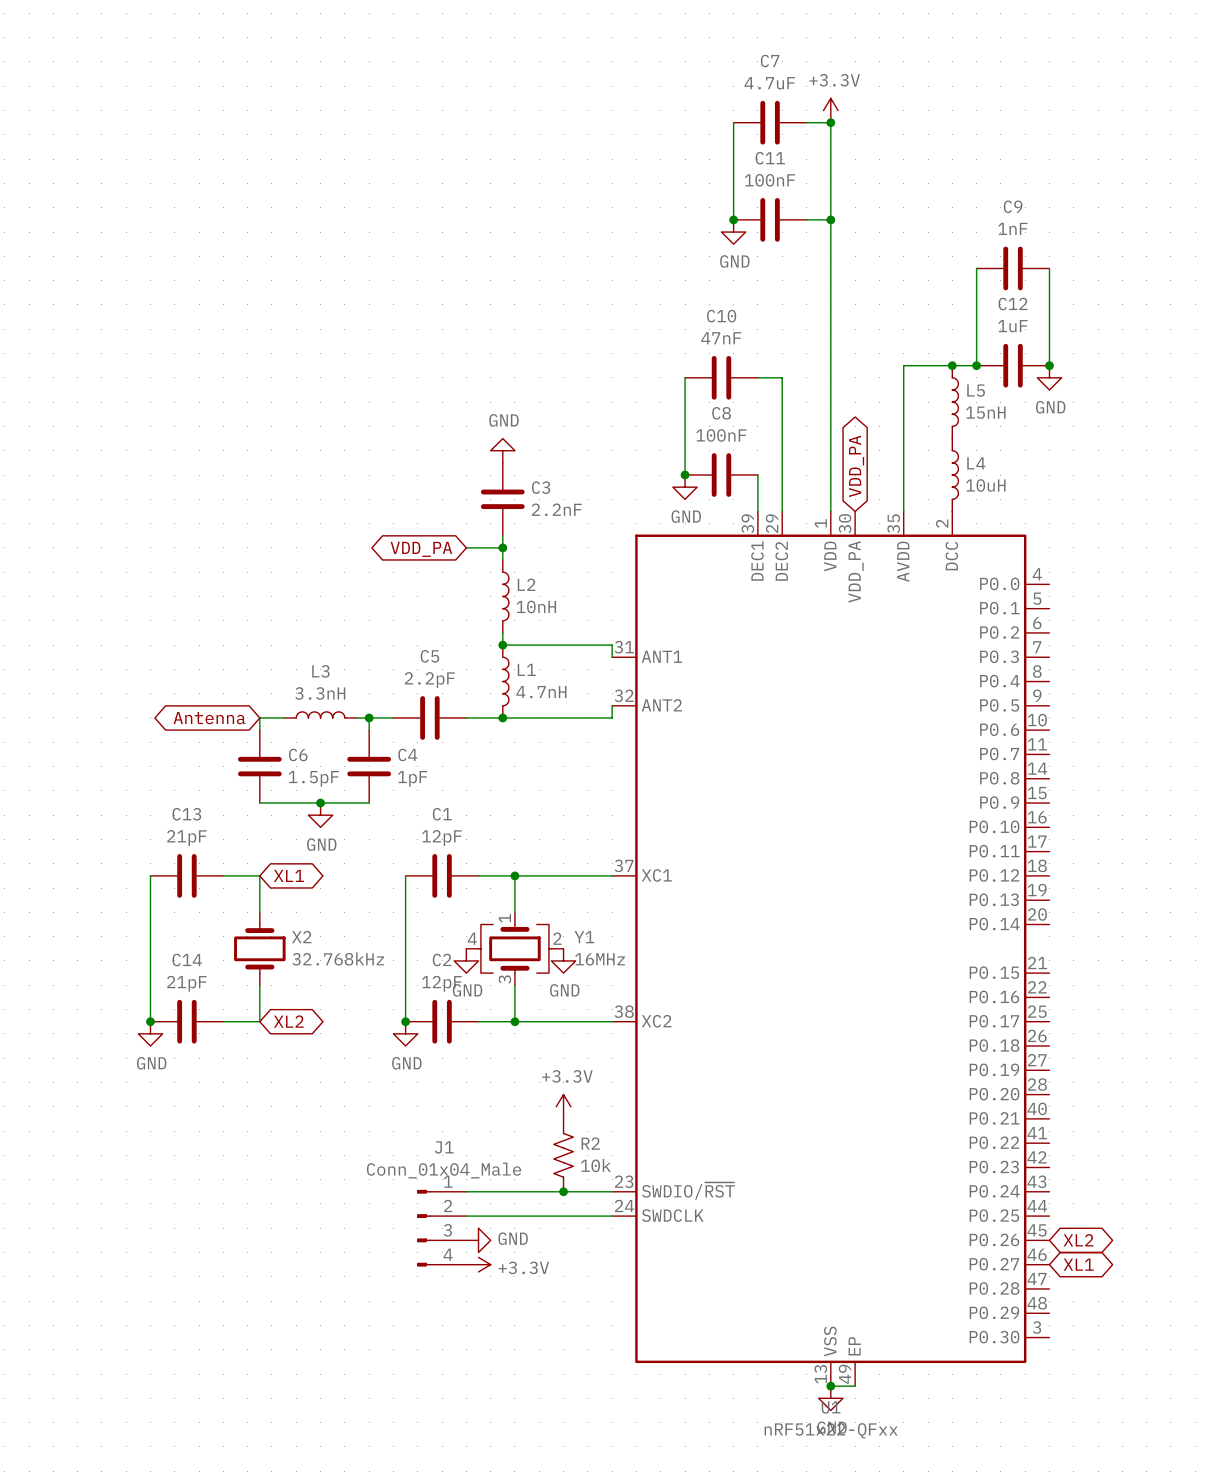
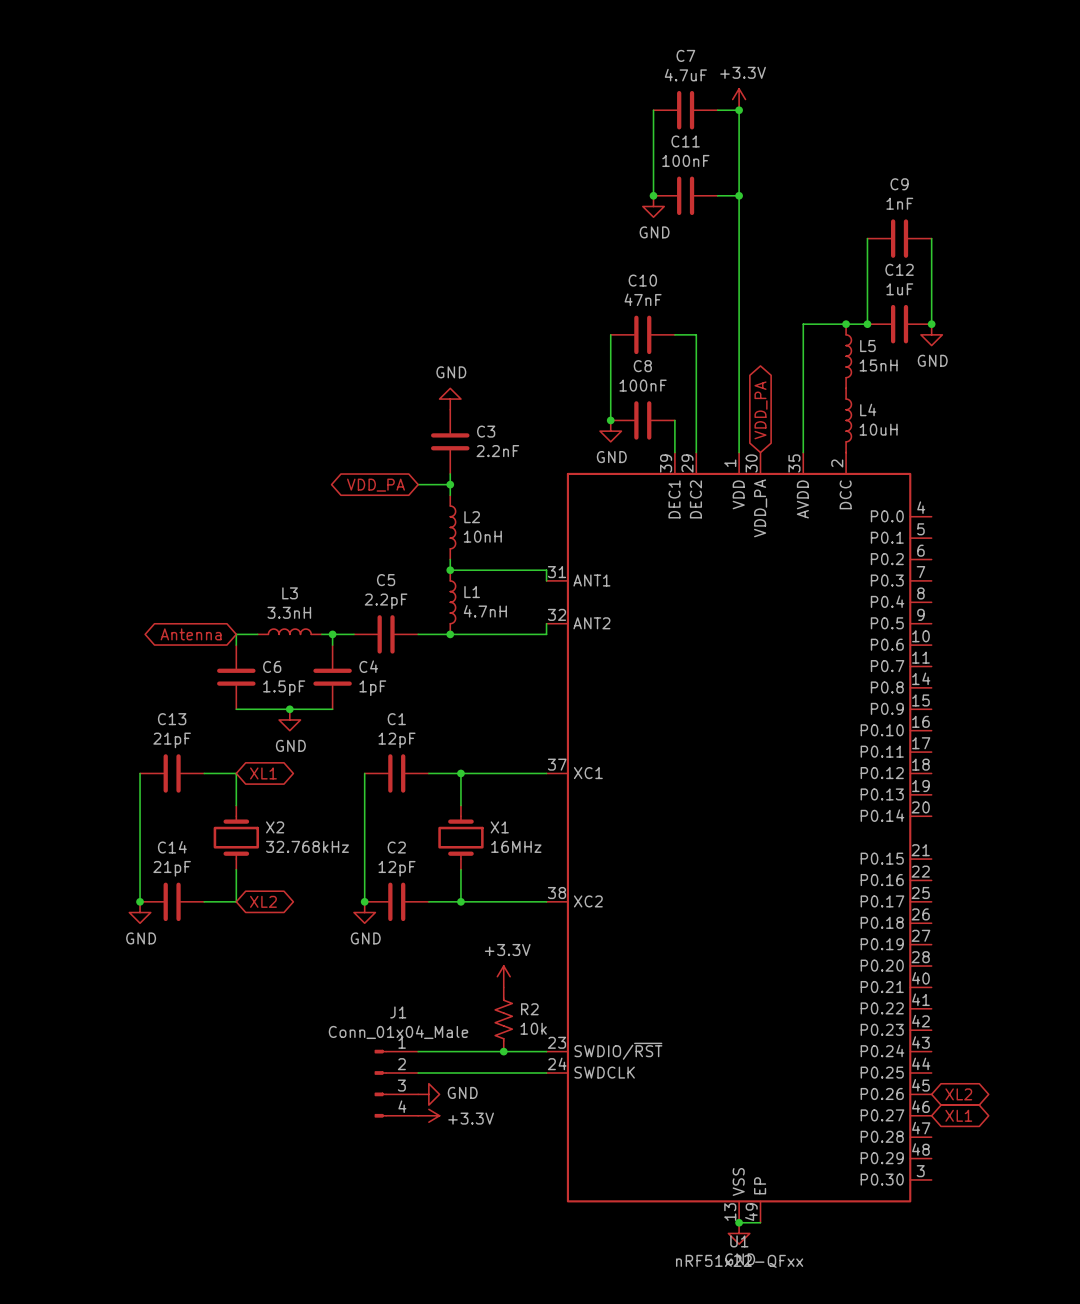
Y1: 16MHz (514, 948) -> none
X1: none -> 16MHz (460, 837)
power symbol: GND (466, 960) -> none
power symbol: GND (563, 960) -> none

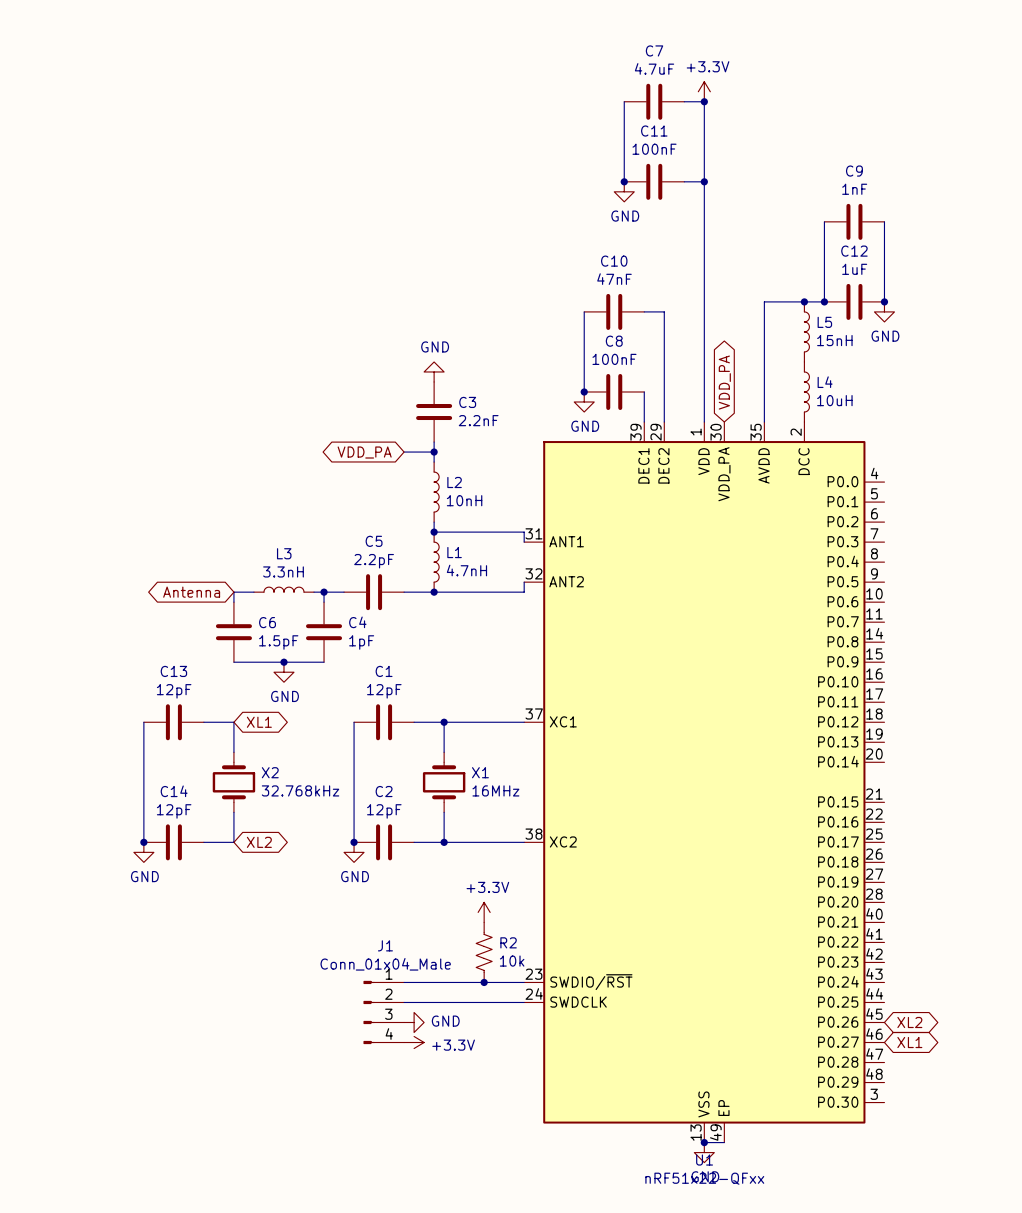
C13 value: 21pF (172, 740) -> 12pF (174, 691)
C14 value: 21pF (172, 868) -> 12pF (174, 811)

